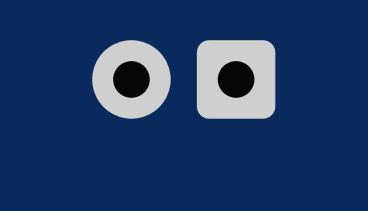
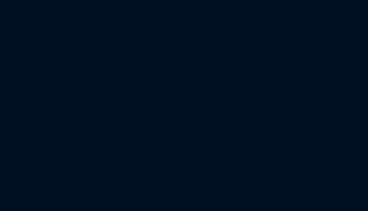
part: (183, 79) -> none

